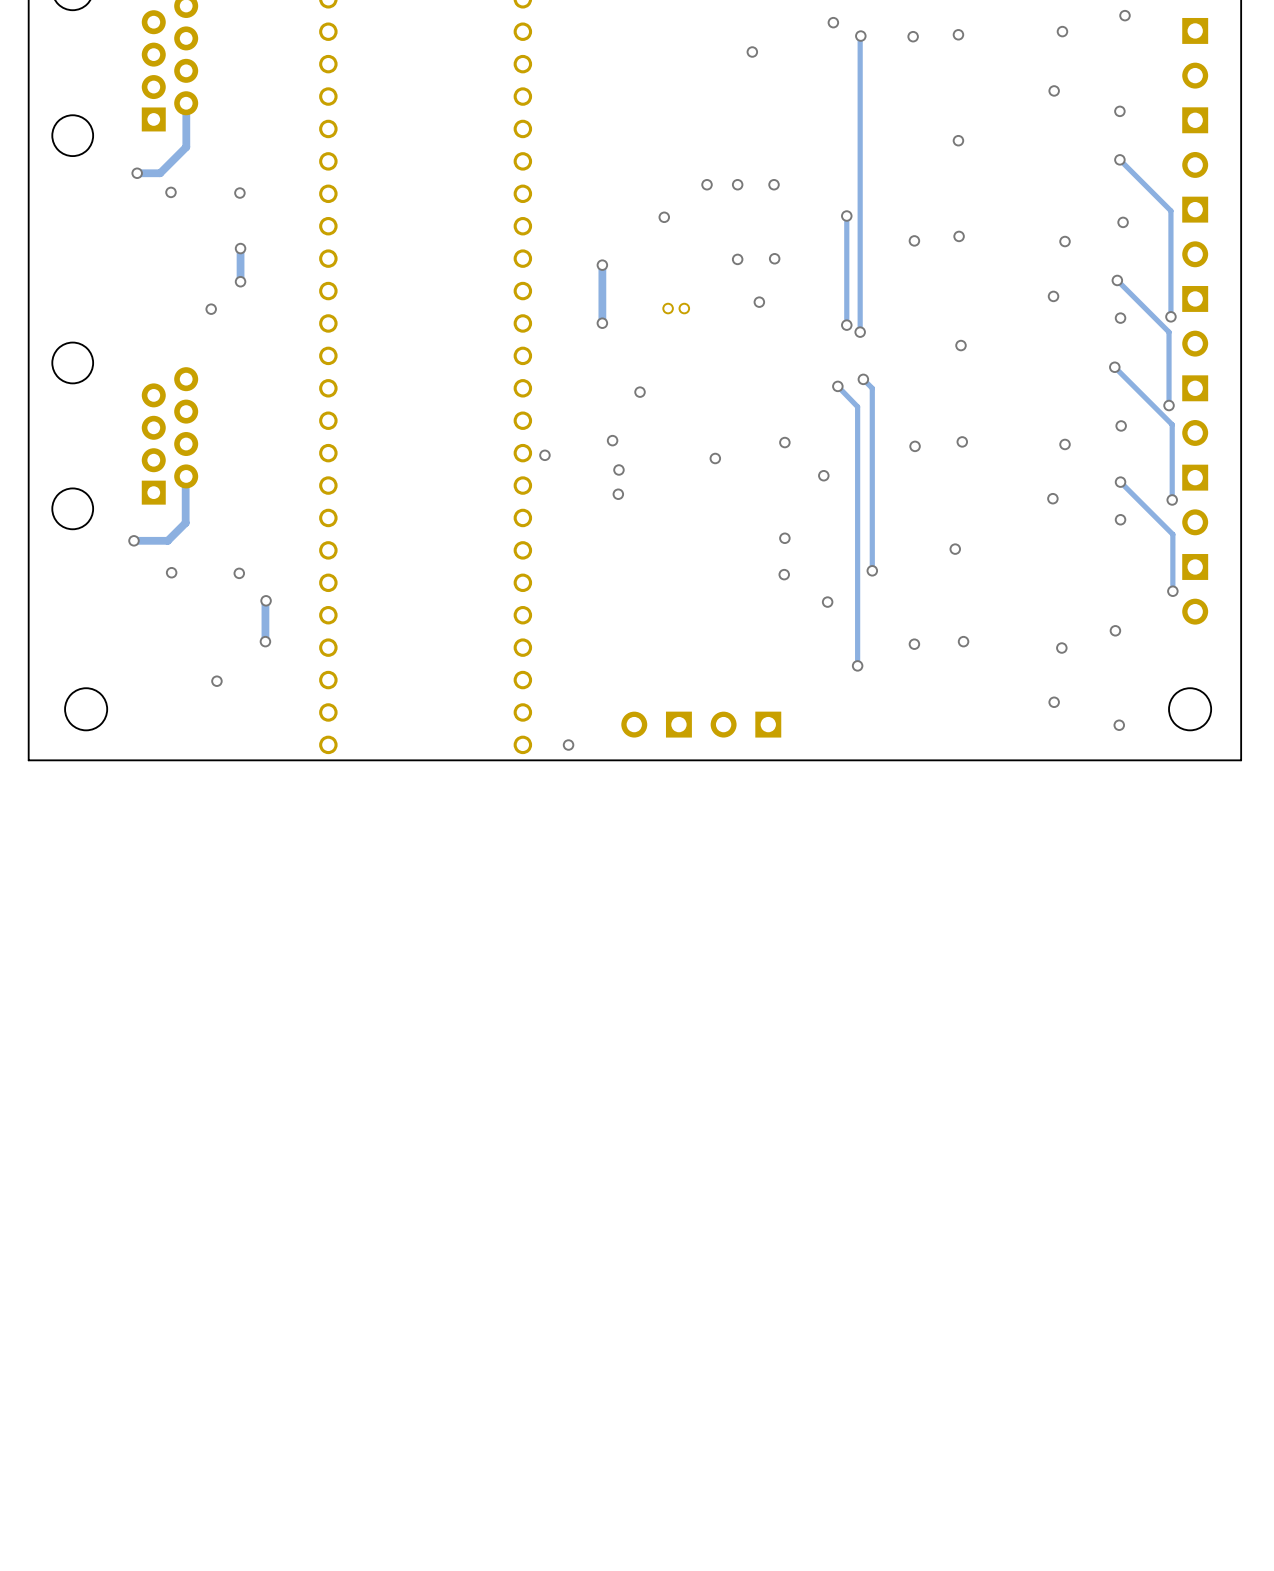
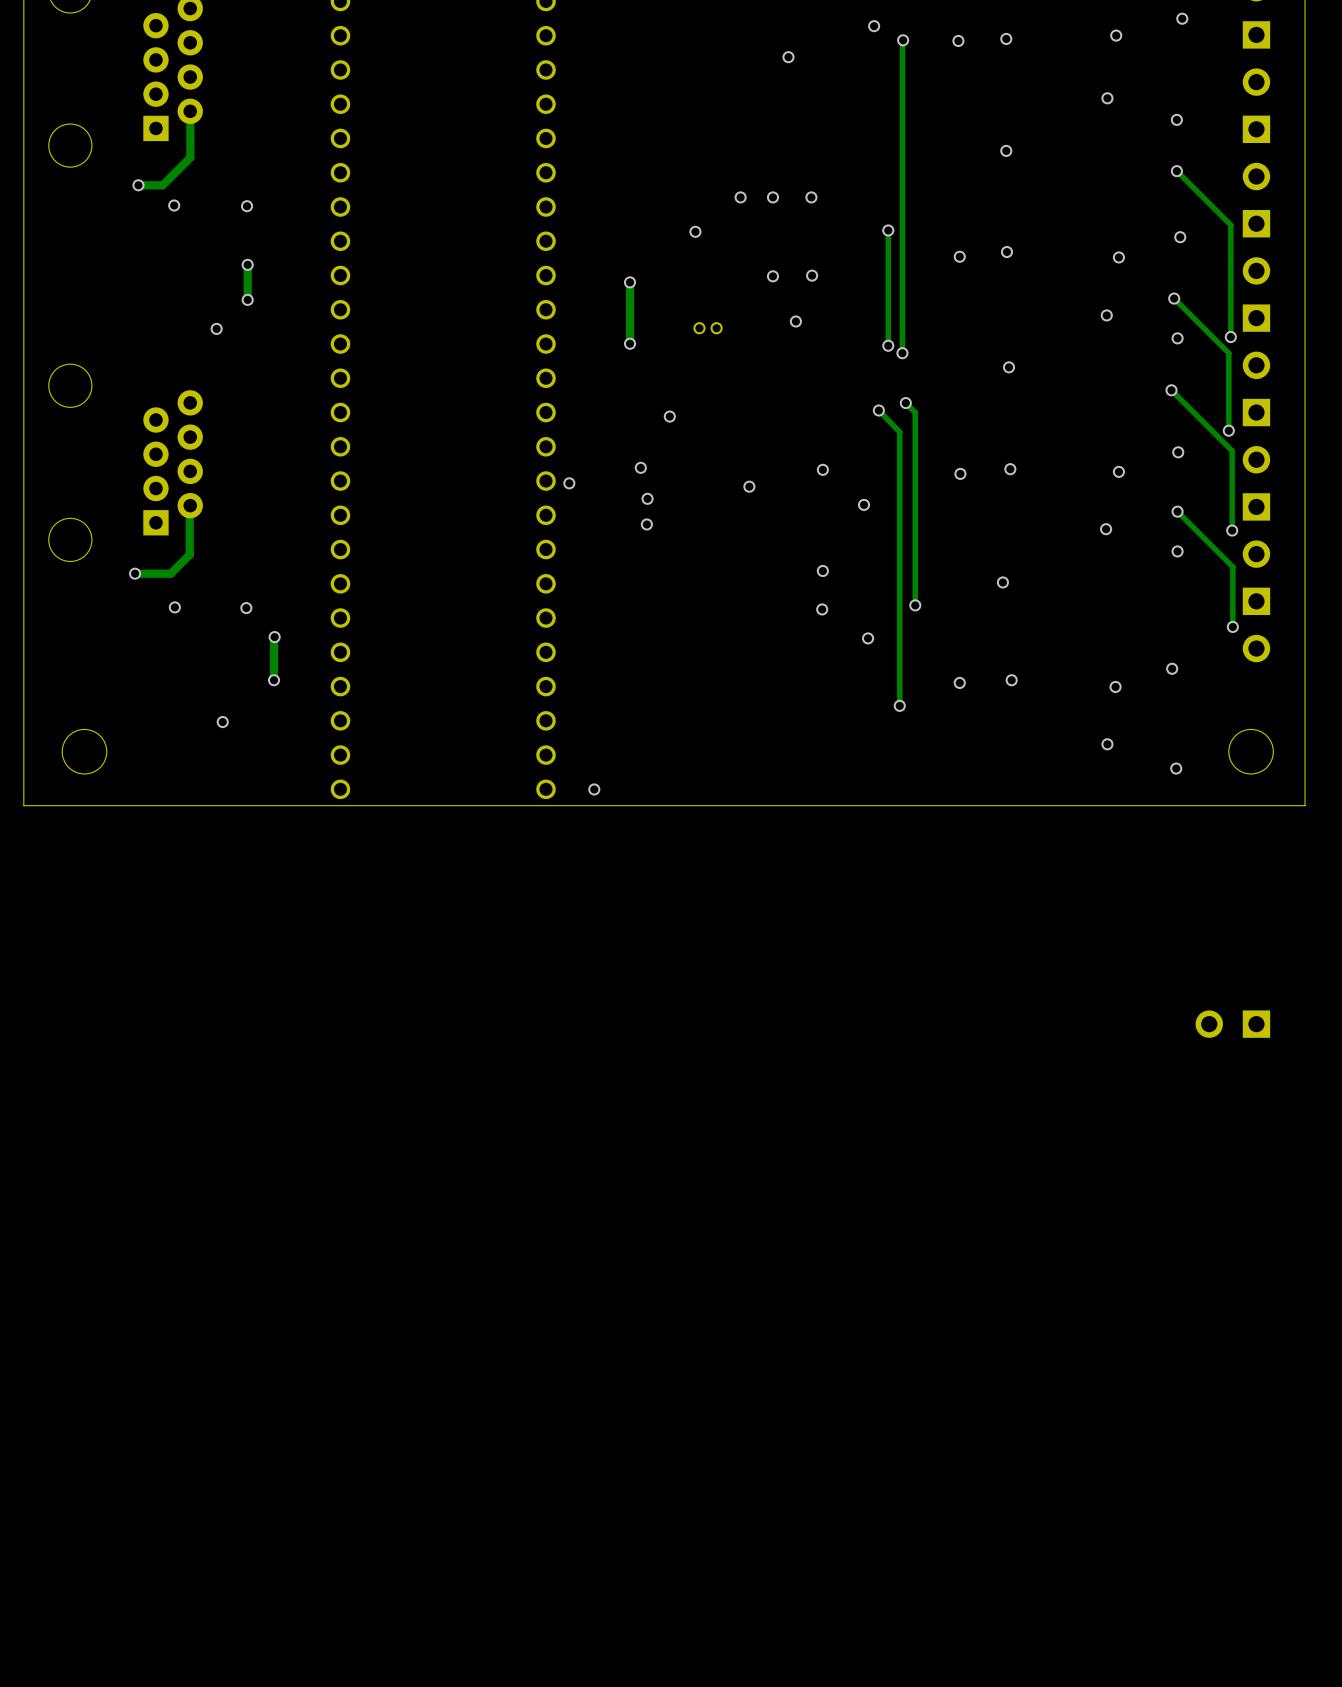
part: (656, 724) -> none
part: (745, 724) -> none
part: none -> (1232, 1024)

